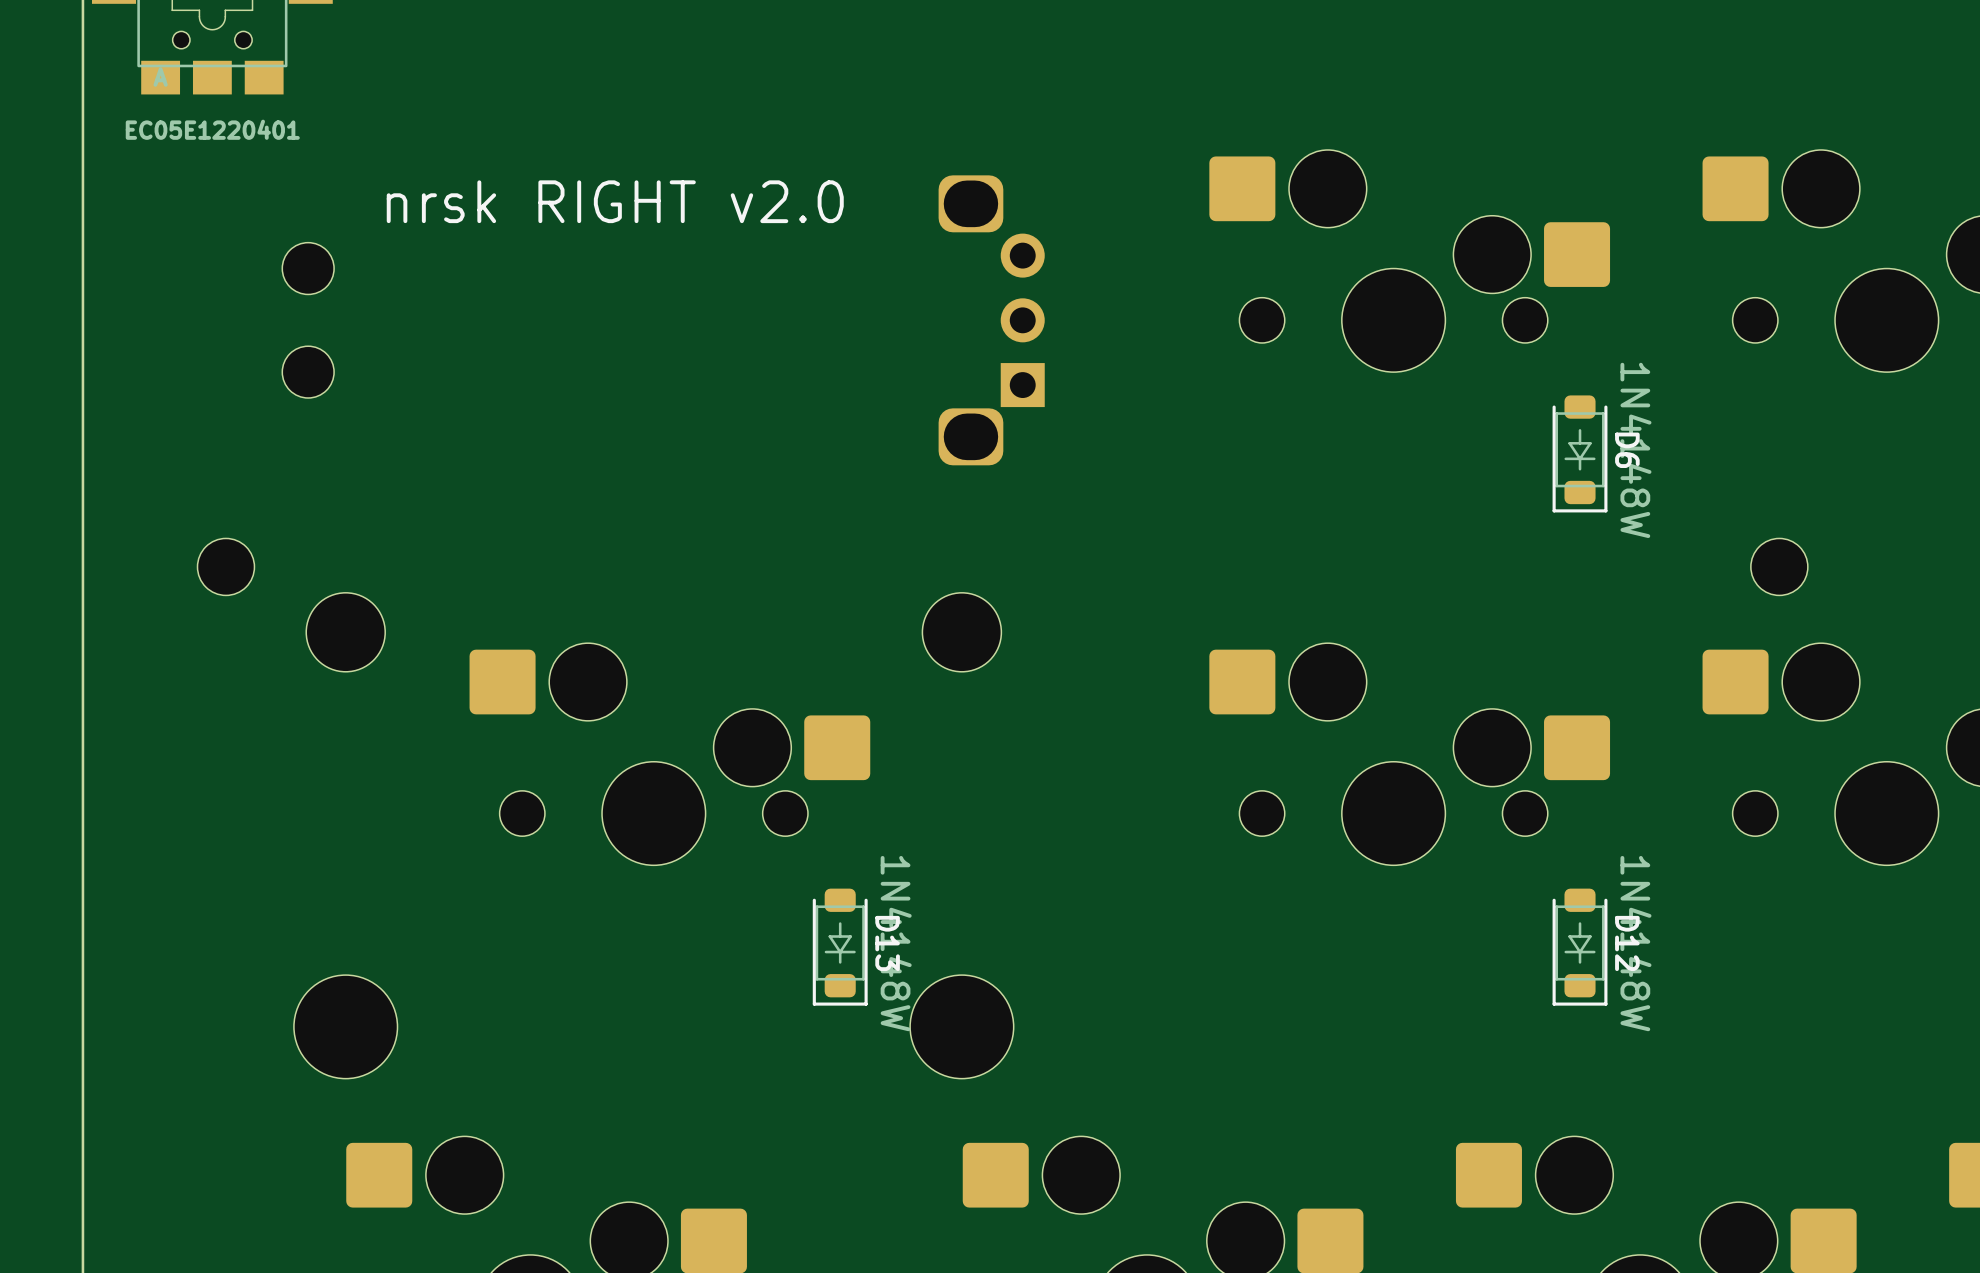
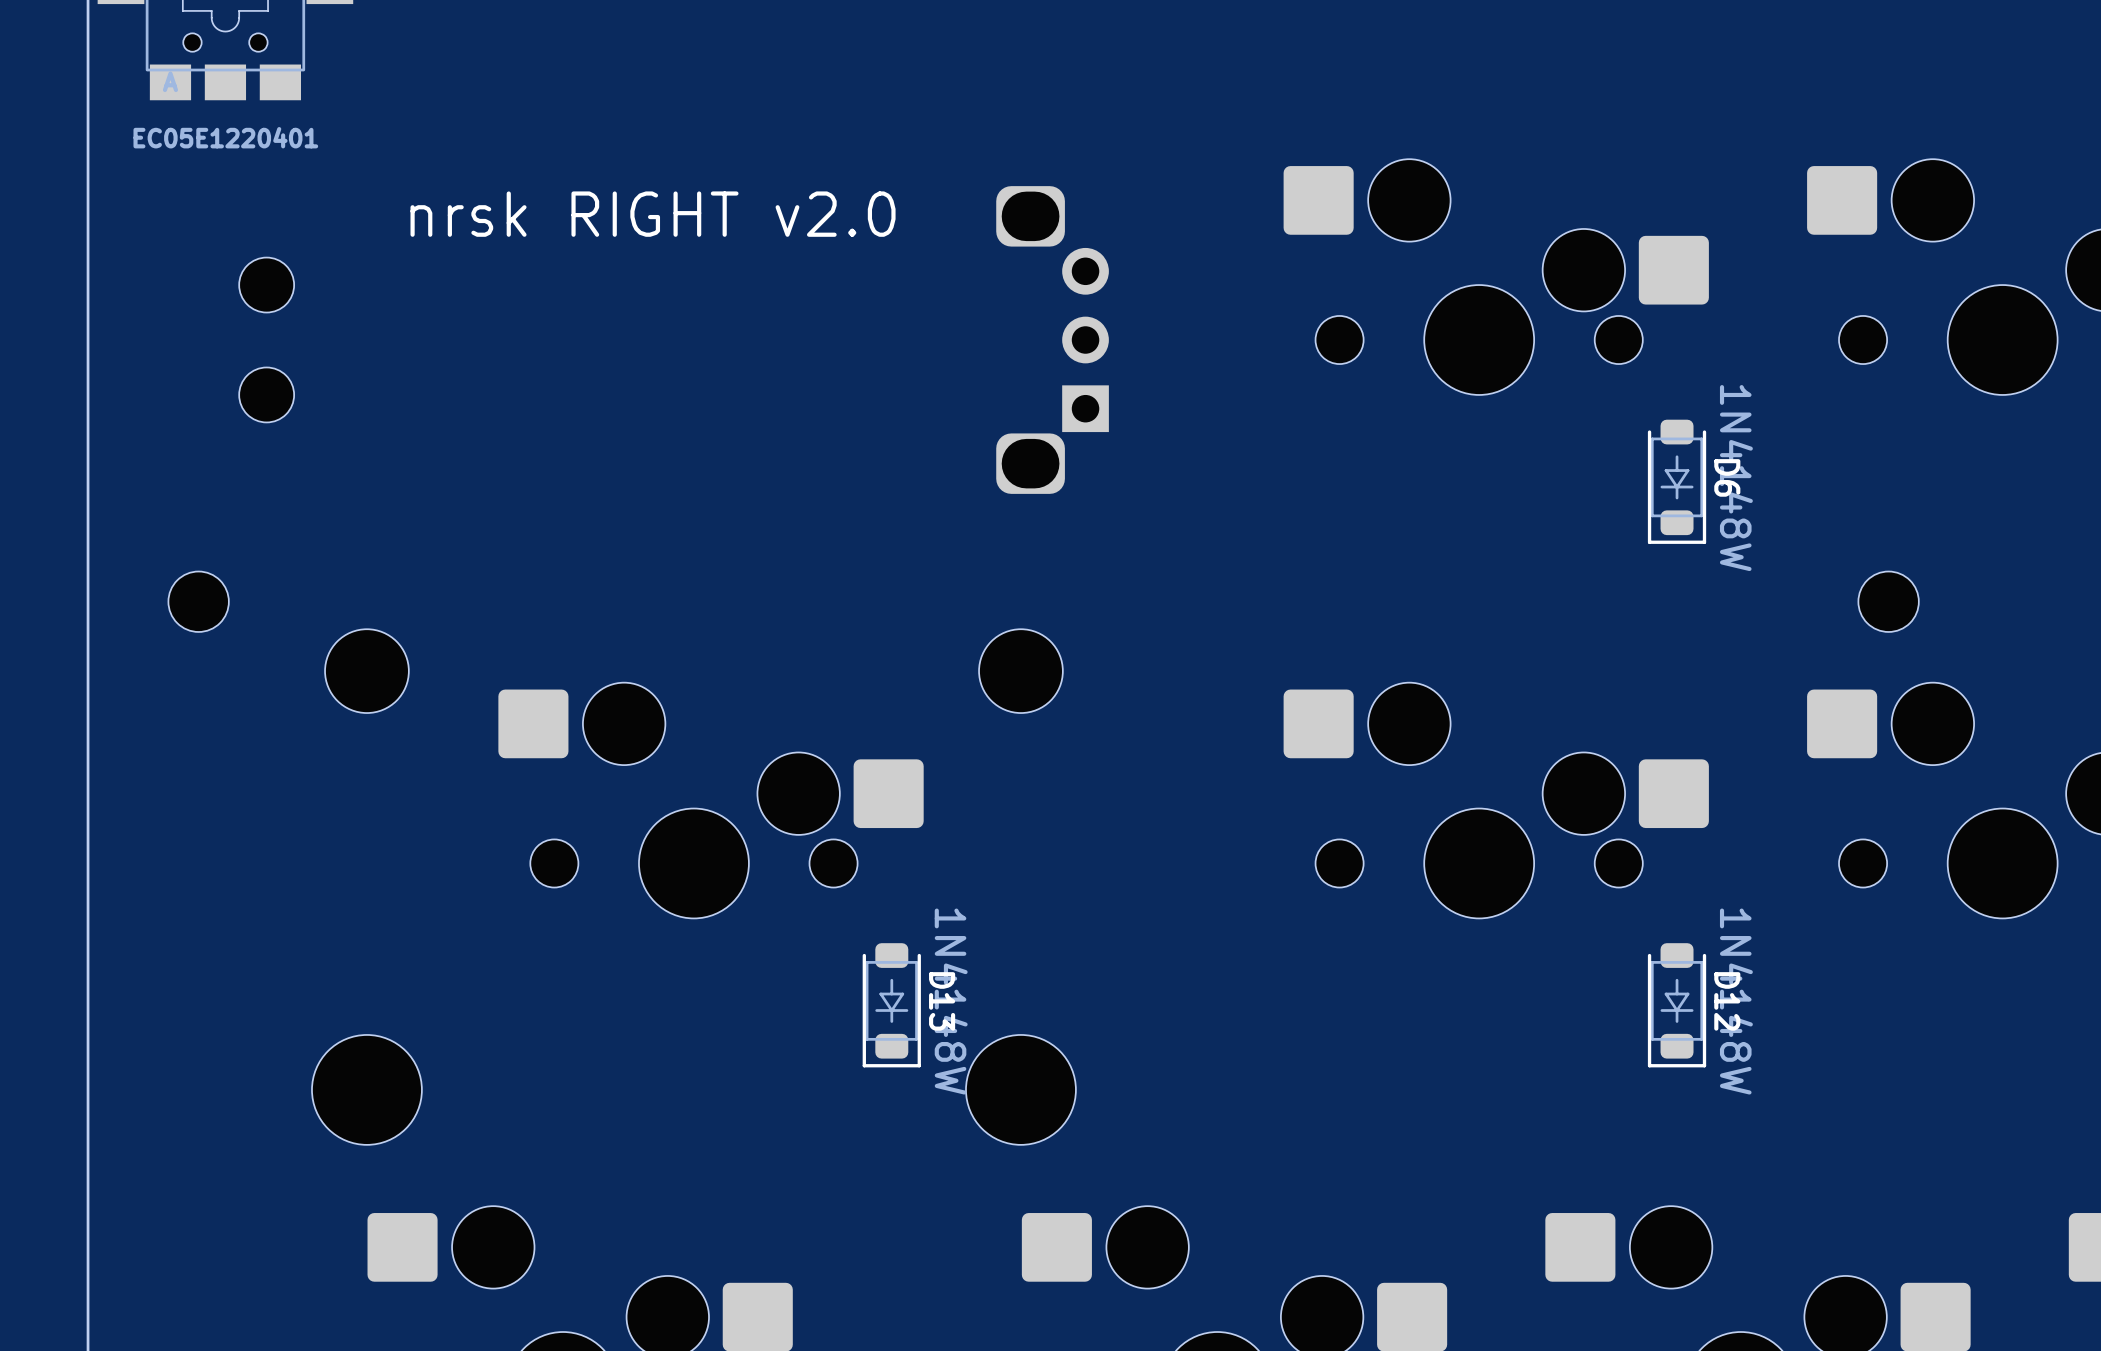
part position: (308, 320) -> (266, 340)
part position: (225, 566) -> (198, 601)

